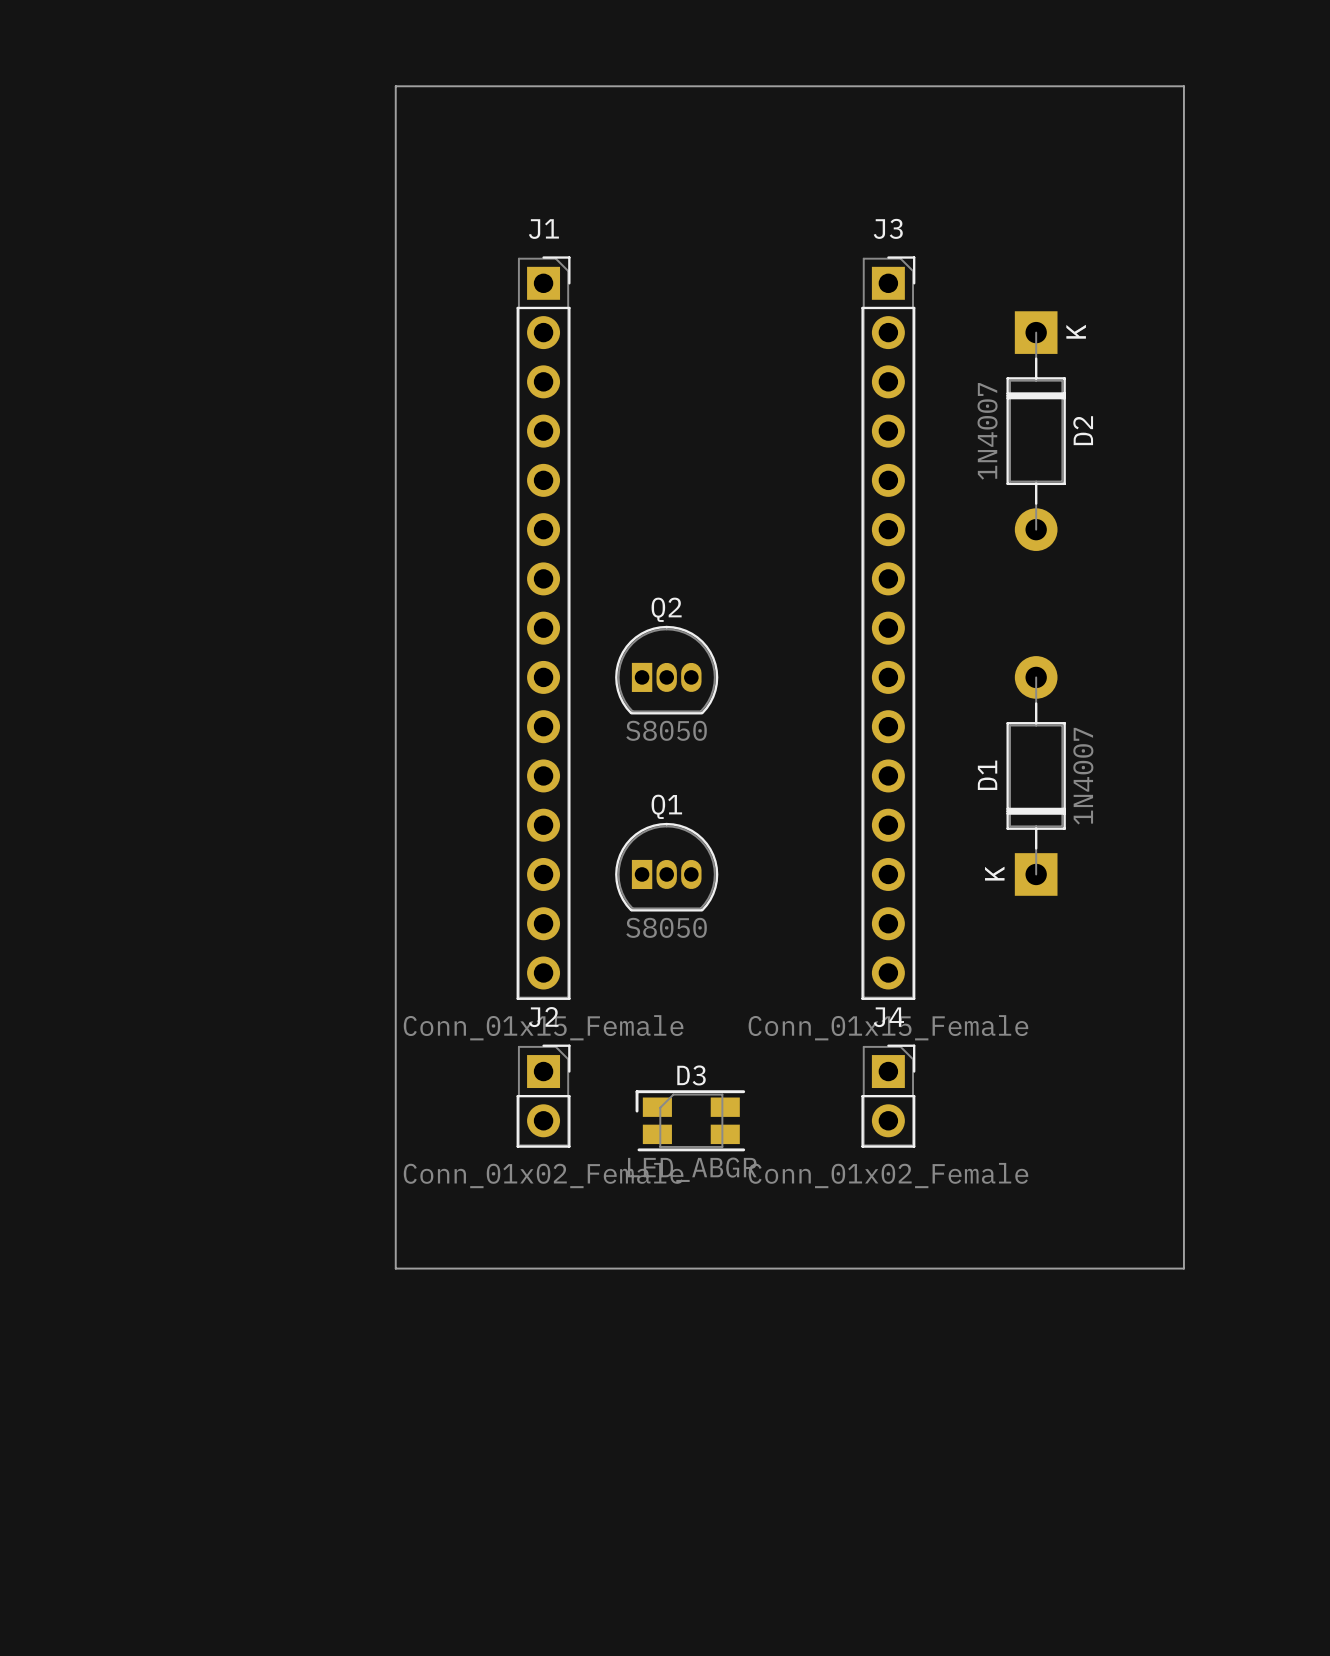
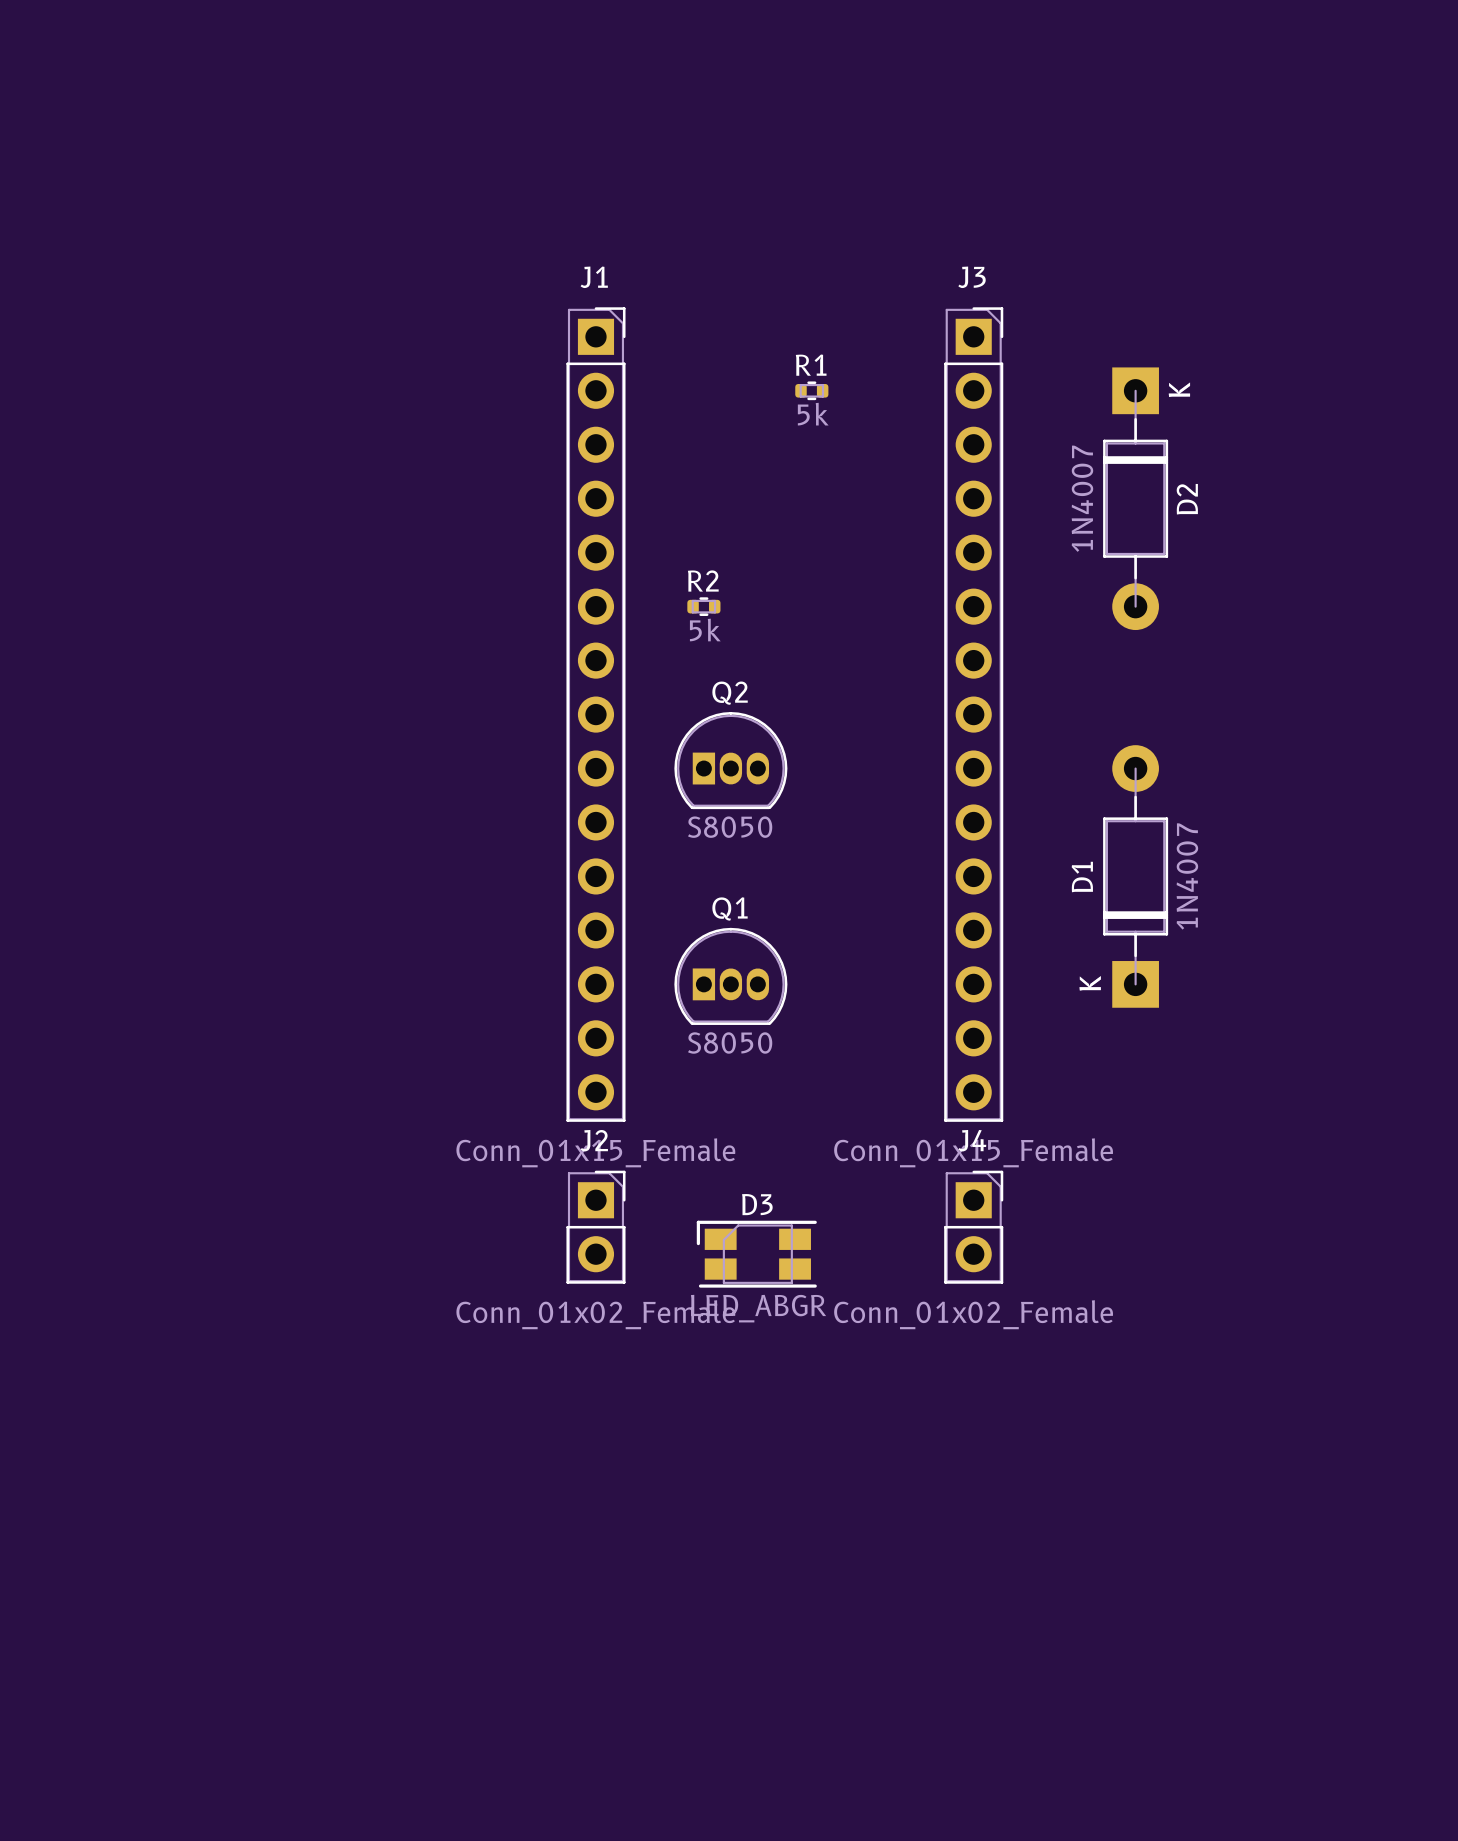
board edge: (395, 86) (395, 1268) (1183, 1268) (1183, 86) (395, 86) -> none
R1: none -> 5k (811, 390)
R2: none -> 5k (703, 606)

